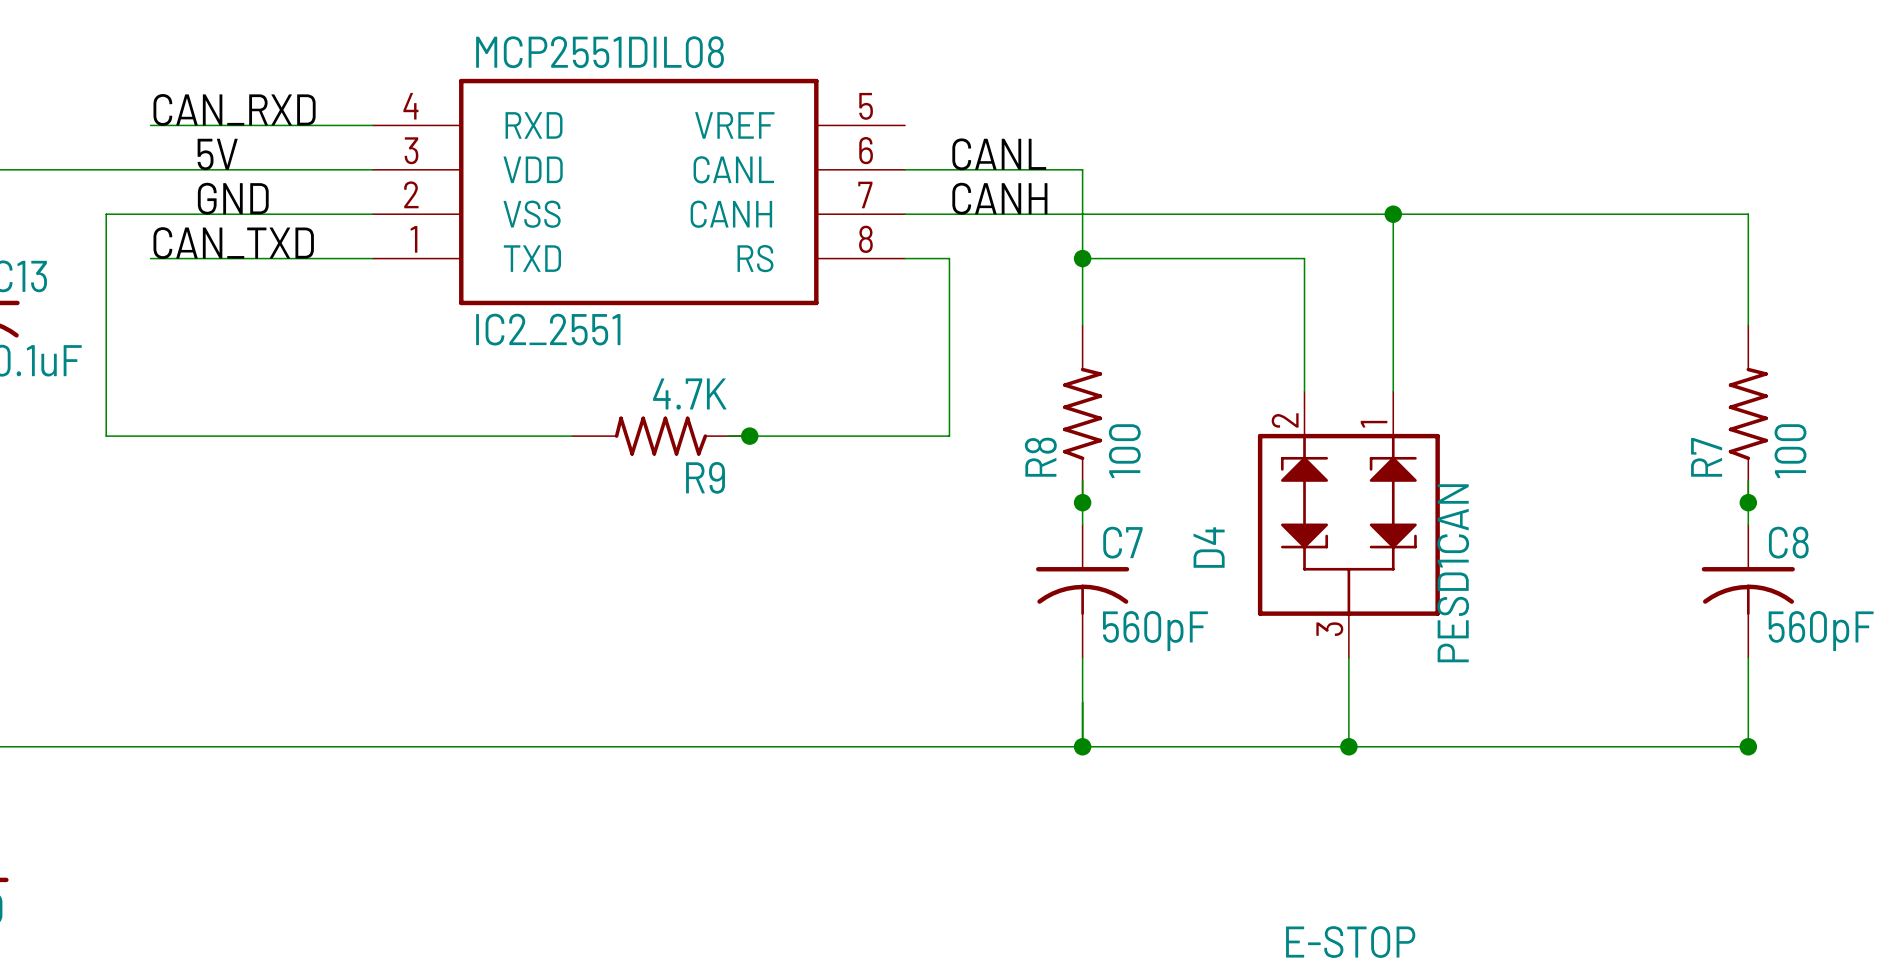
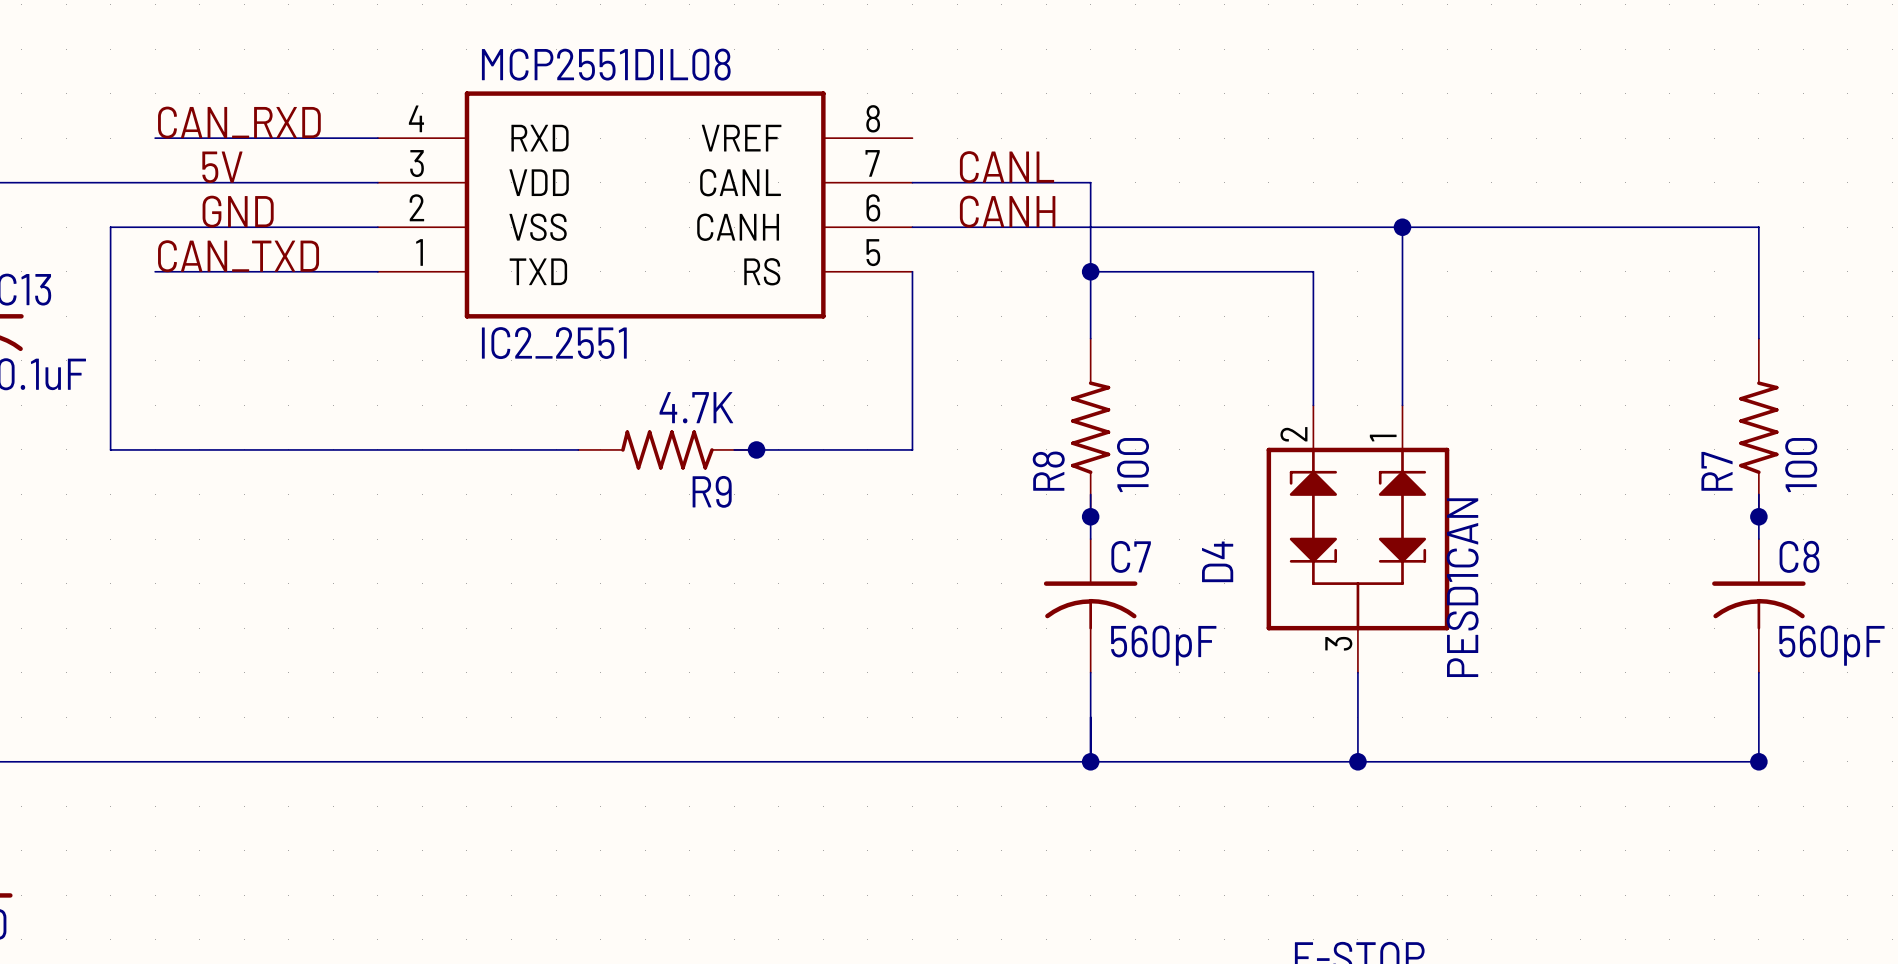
IC2_2551 pin number: 5 (866, 106) -> 8 (873, 118)
IC2_2551 pin number: 6 (866, 150) -> 7 (872, 163)
IC2_2551 pin number: 7 (865, 194) -> 6 (873, 207)
IC2_2551 pin number: 8 (865, 239) -> 5 (873, 252)
wire: (905, 258) (949, 258) (949, 436) (905, 436) -> (912, 271) (912, 449)

